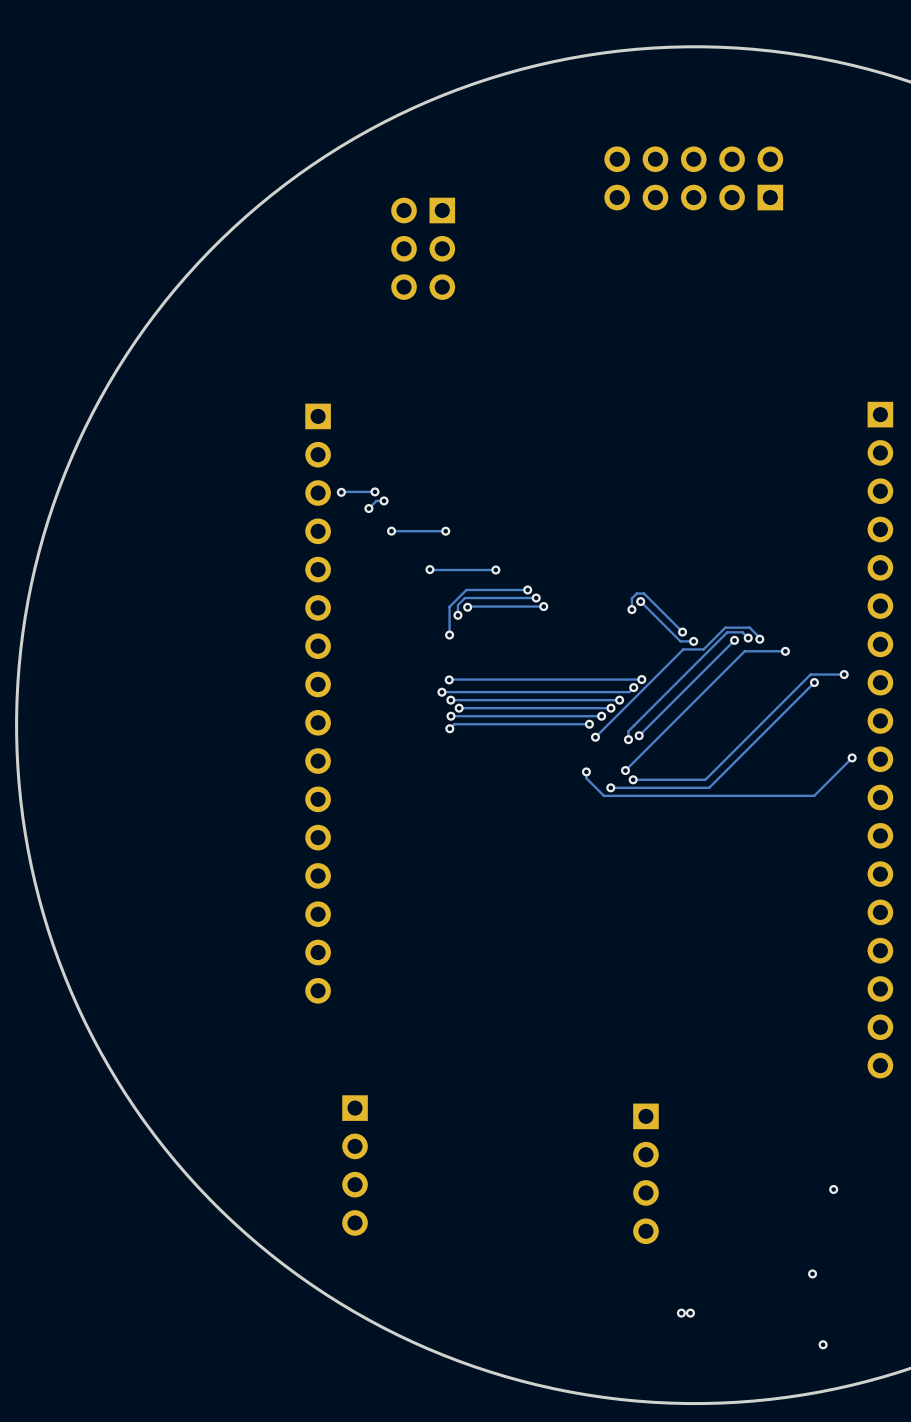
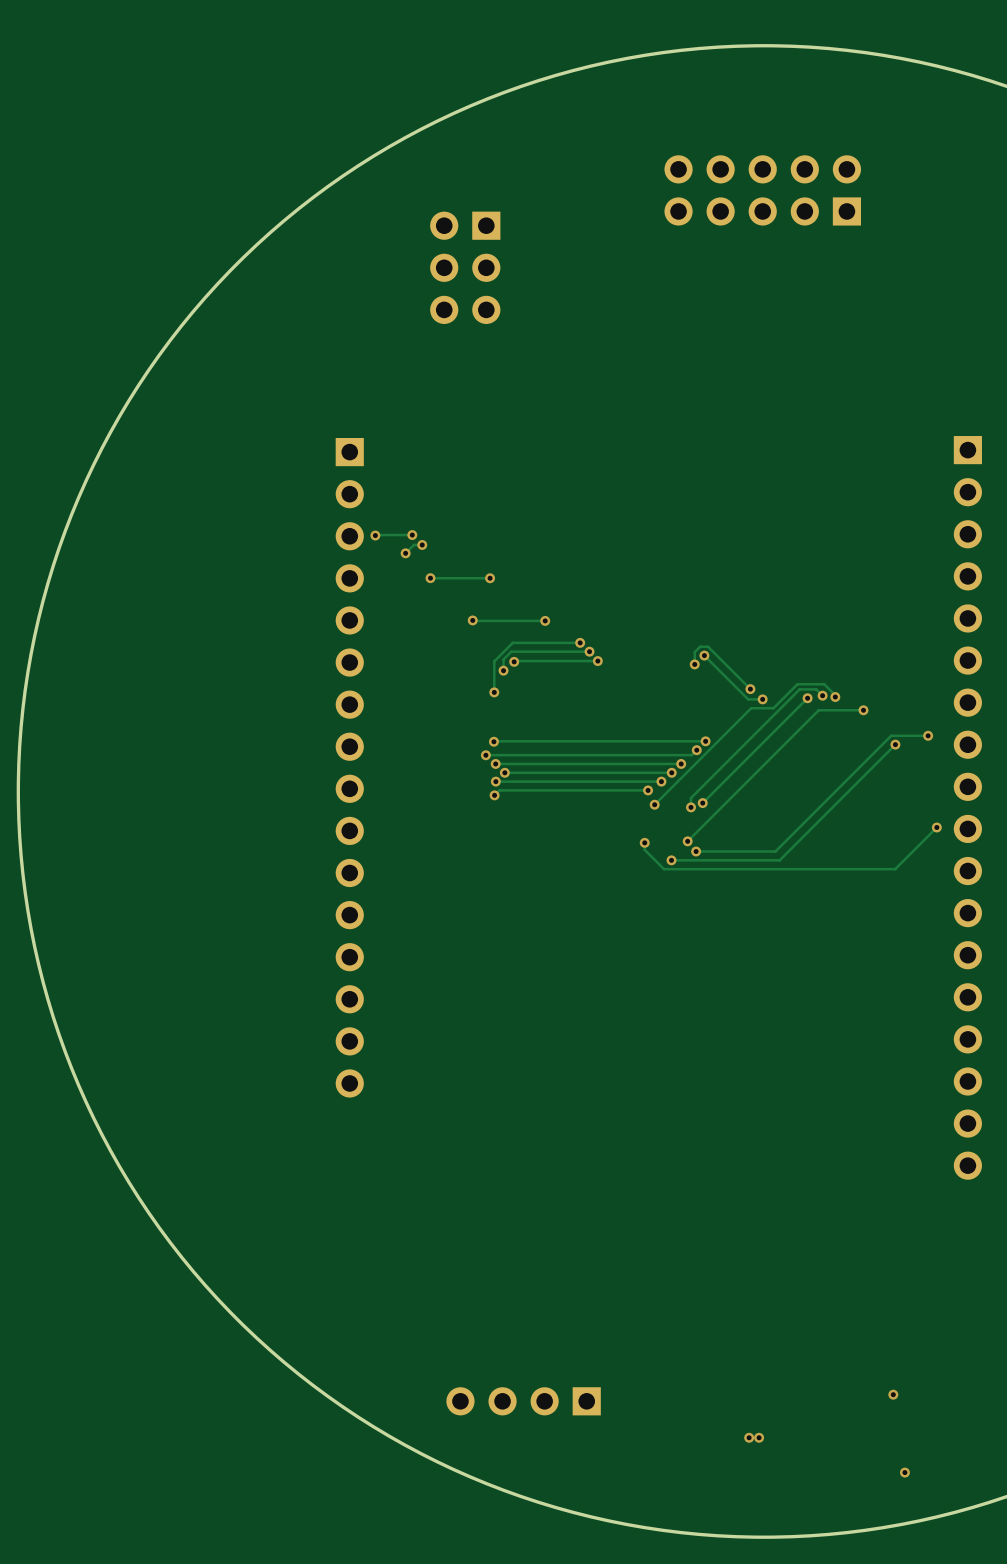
part: (355, 1165) -> none
part: (645, 1173) -> none
via: (833, 1189) -> none
part: none -> (523, 1401)

